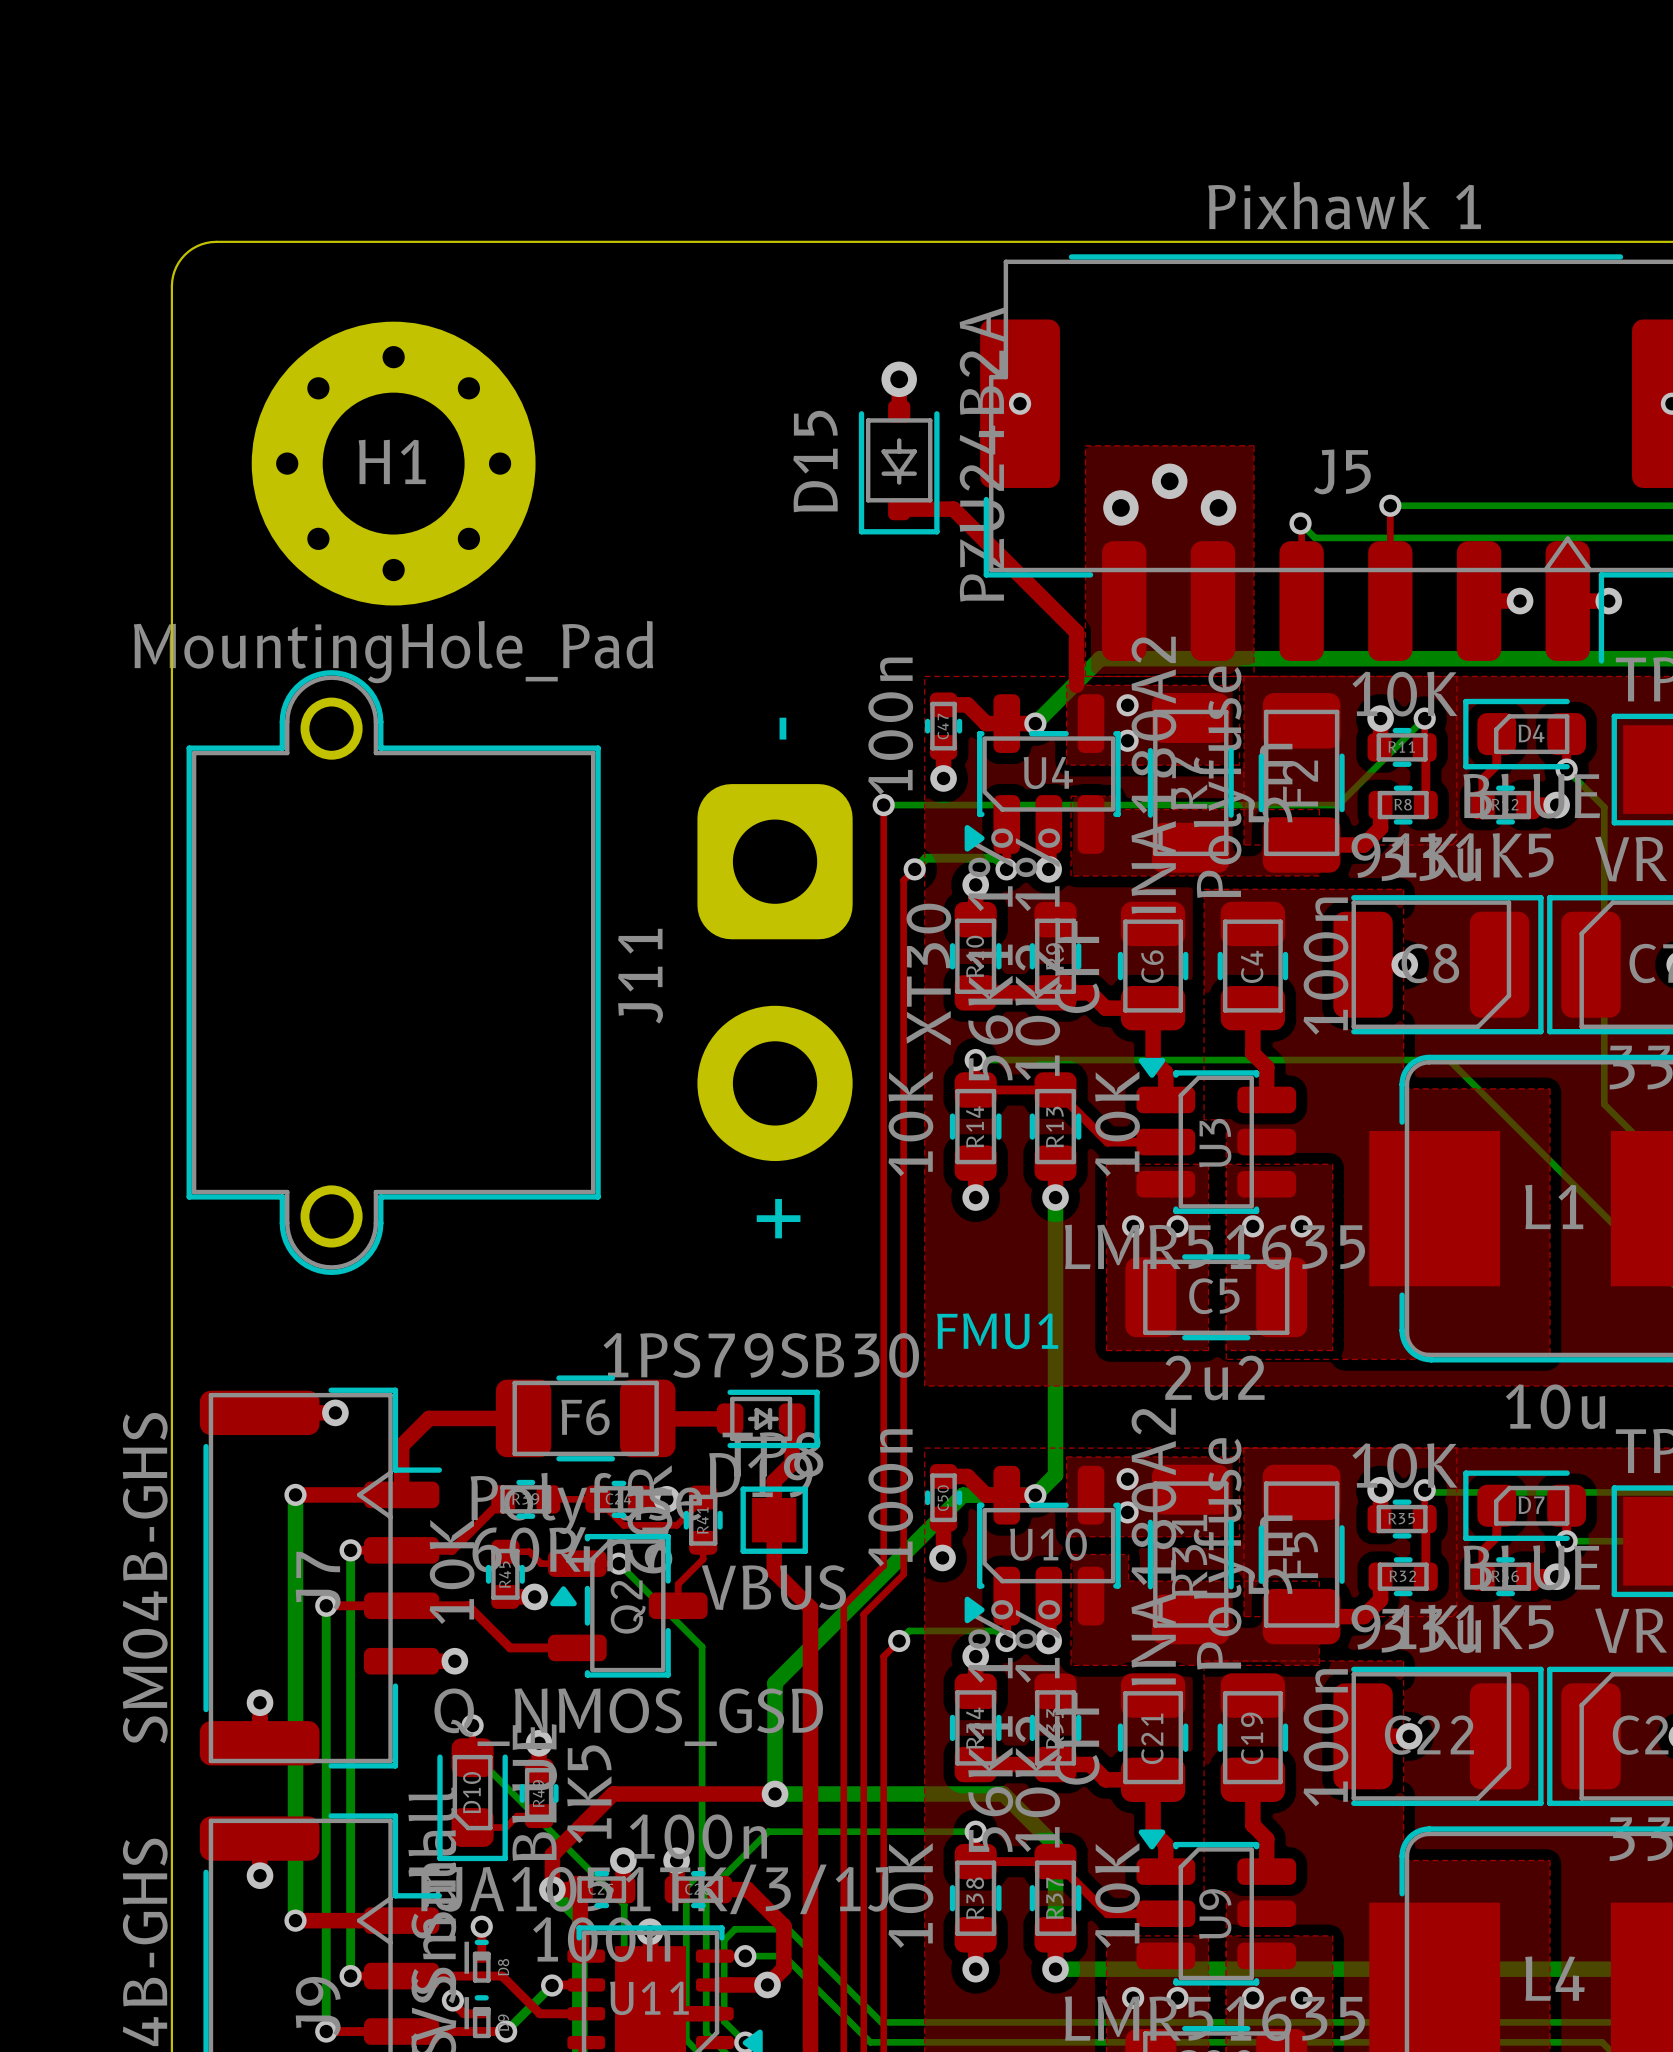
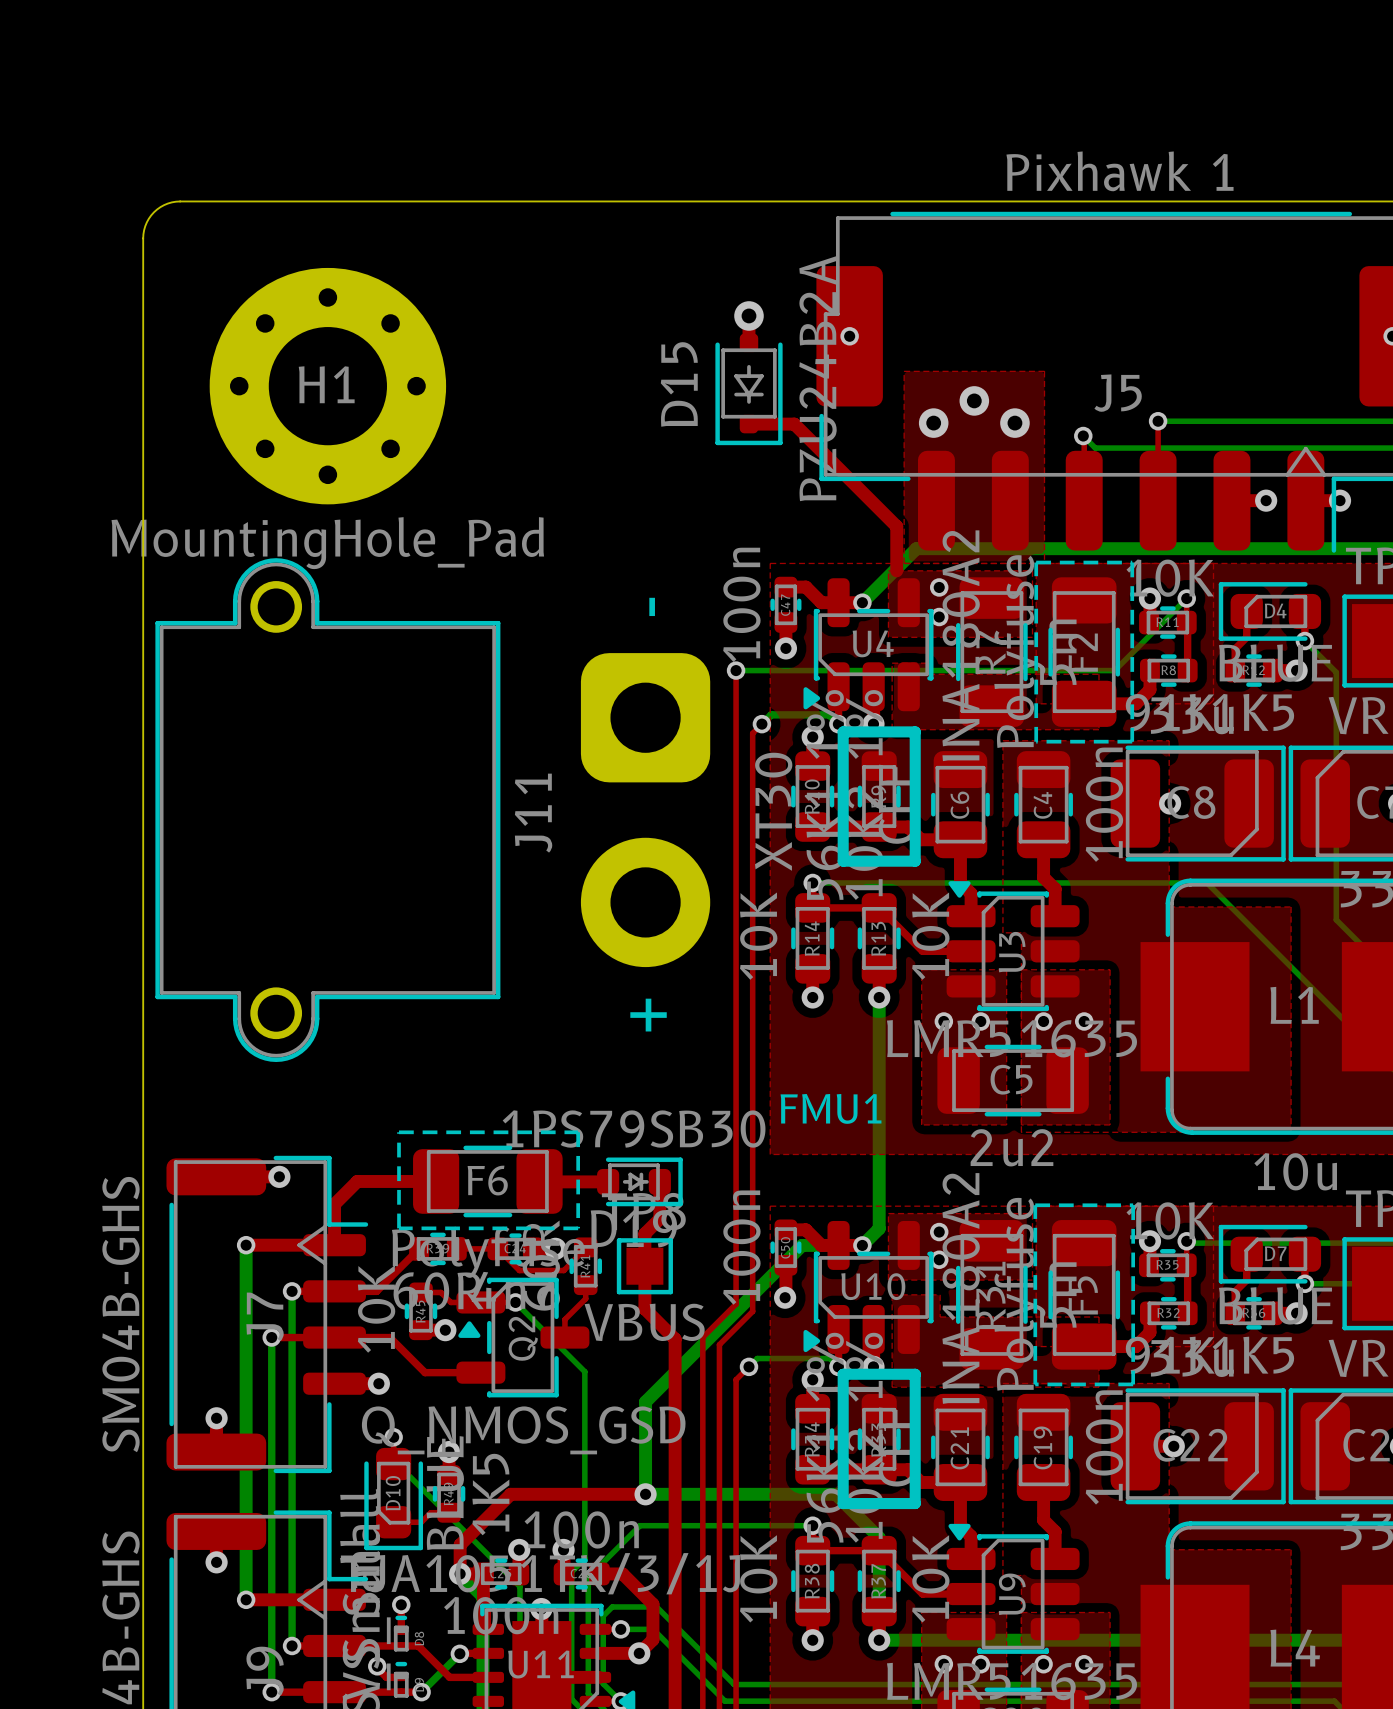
line: none -> (1036, 562) (1132, 562) (1132, 741) (1036, 741) (1036, 562)
line: none -> (843, 731) (843, 861) (915, 861) (915, 731) (843, 731)
line: none -> (399, 1132) (578, 1132) (578, 1228) (399, 1228) (399, 1132)
line: none -> (1035, 1205) (1133, 1205) (1133, 1384) (1035, 1384) (1035, 1205)
line: none -> (843, 1374) (915, 1374) (915, 1503) (843, 1503) (843, 1374)

